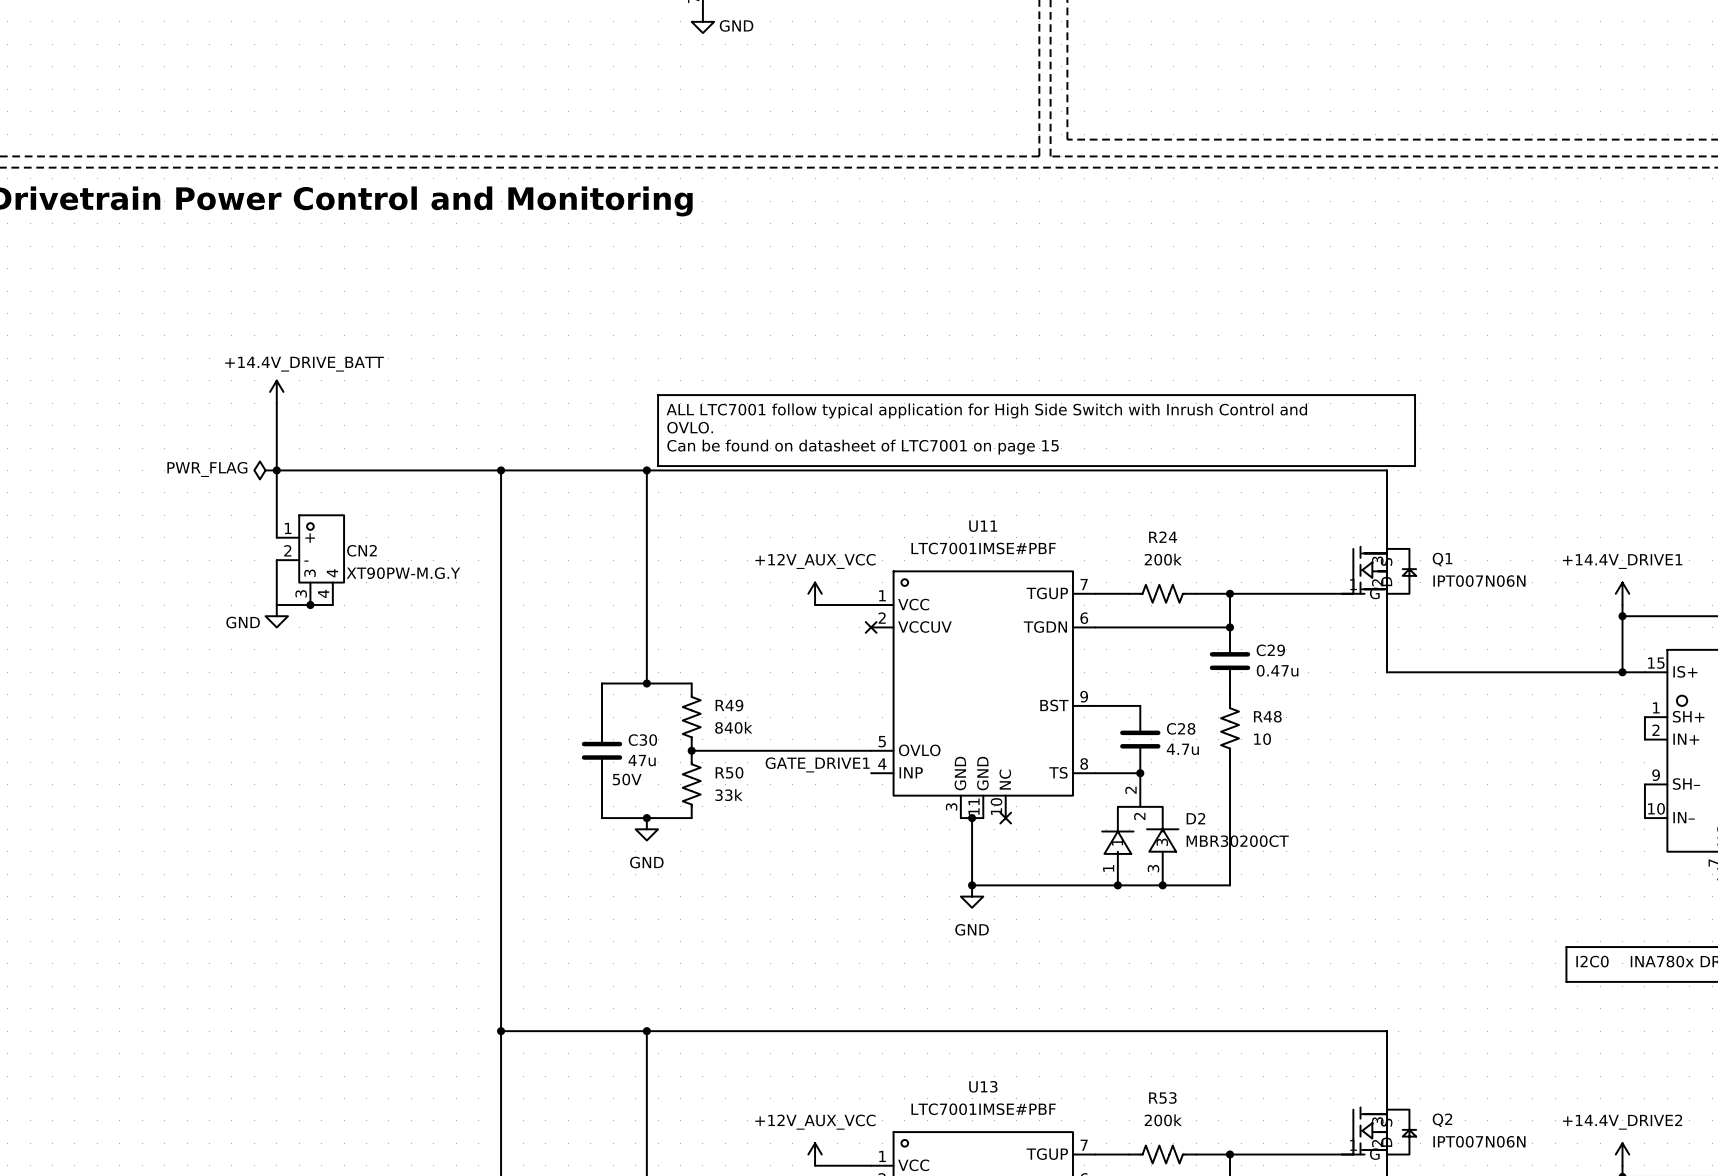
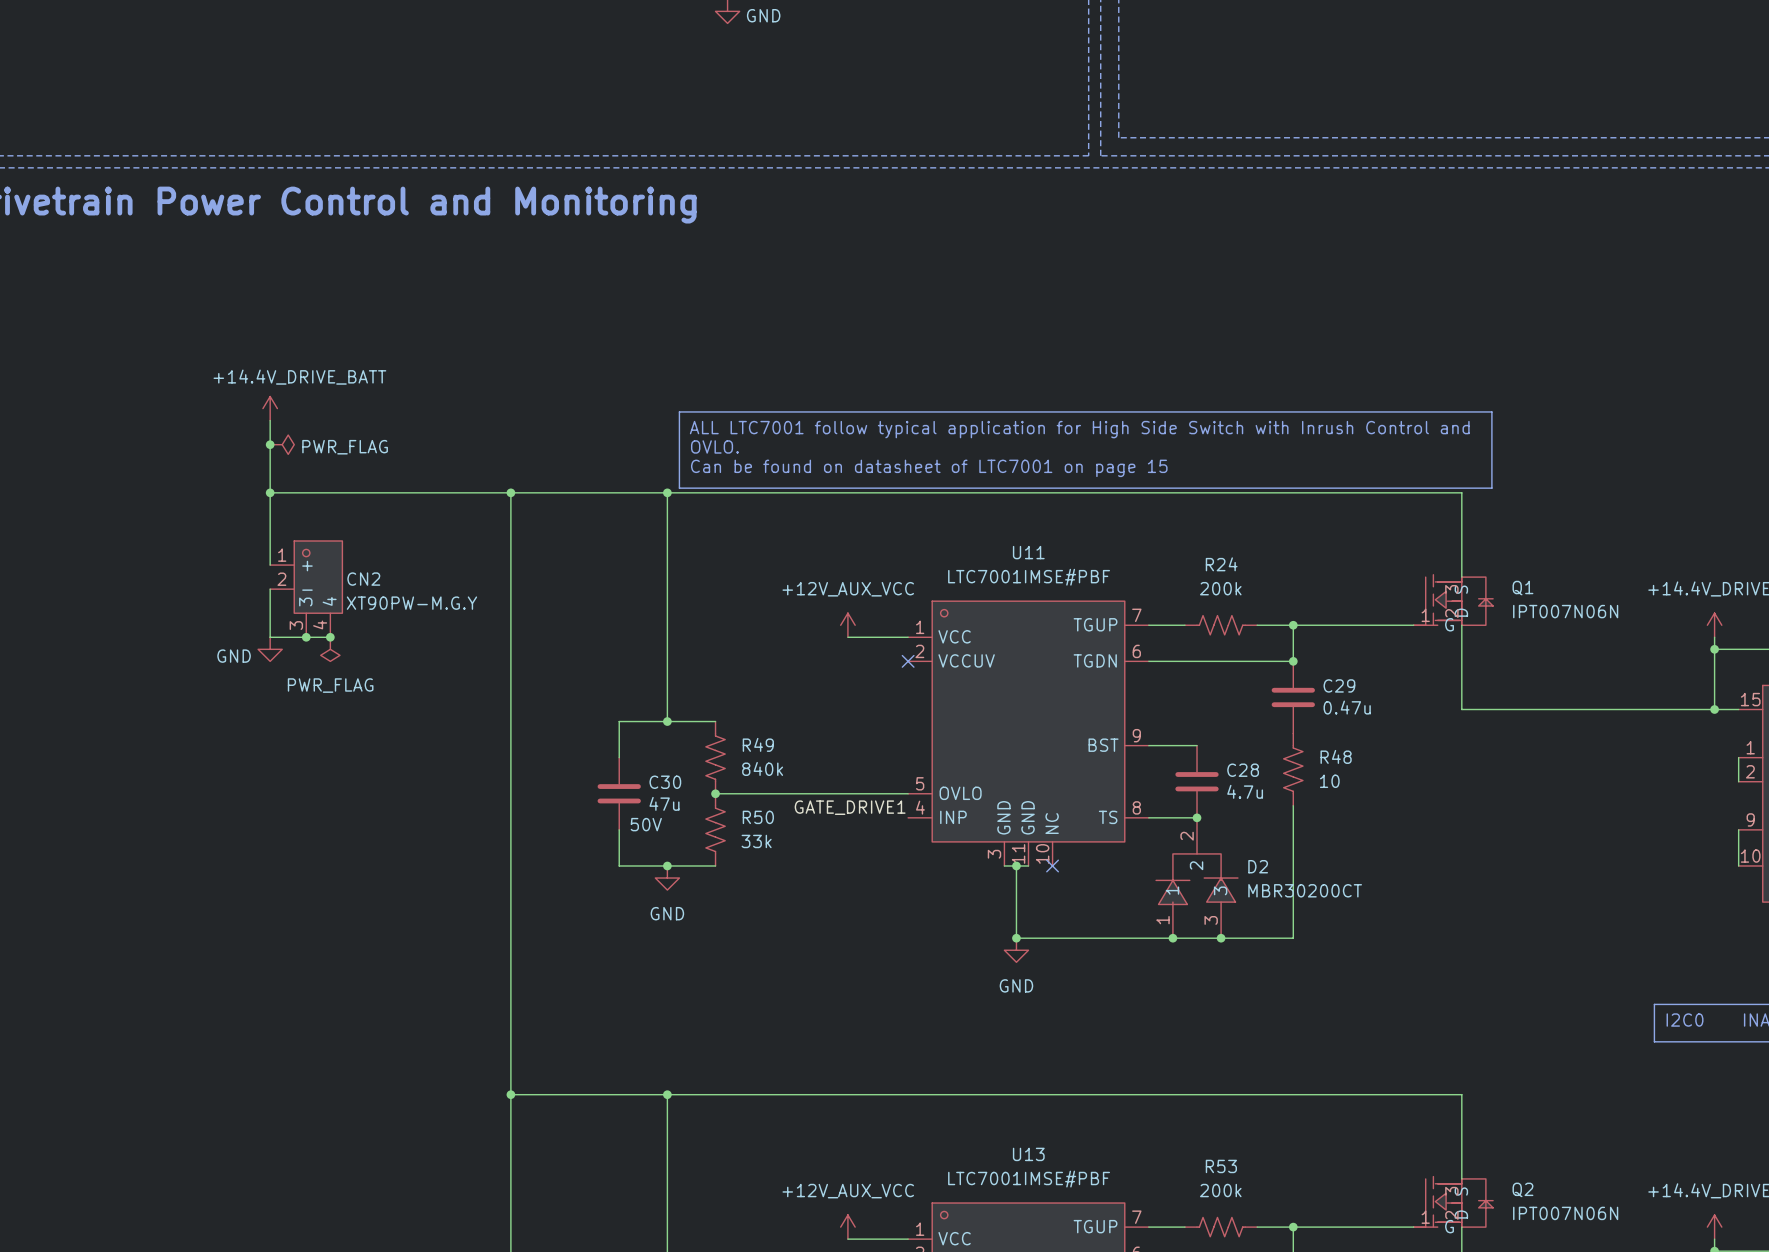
junction: none -> (270, 444)
power symbol rotation: 0° (265, 470) -> 180° (282, 444)
power symbol position: PWR_FLAG (265, 470) -> PWR_FLAG (282, 444)
junction: none -> (330, 637)
power symbol: none -> PWR_FLAG (330, 649)

